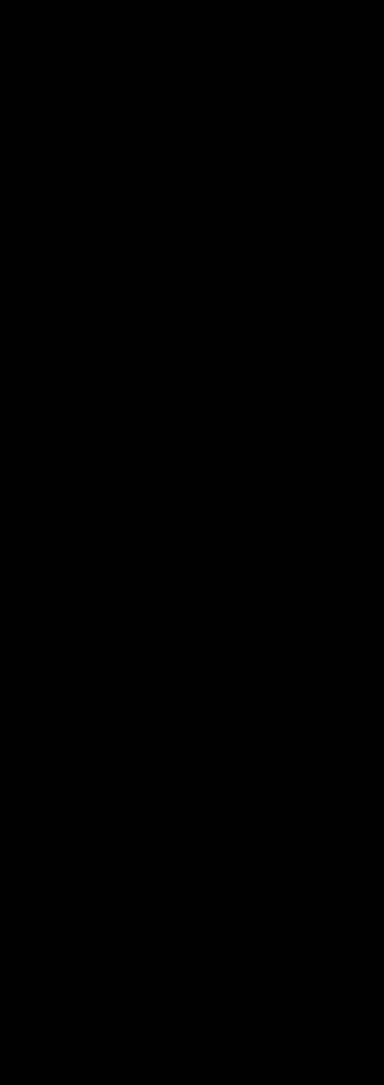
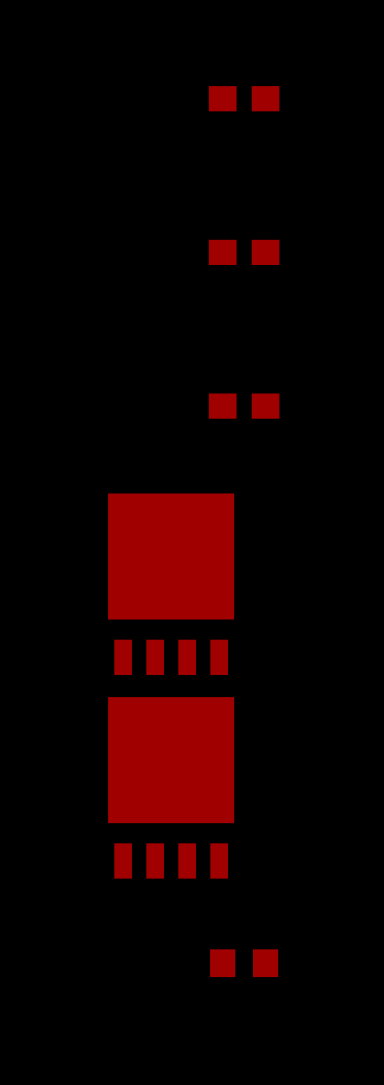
part: none -> (244, 98)
part: none -> (244, 252)
part: none -> (244, 406)
part: none -> (171, 584)
part: none -> (171, 787)
part: none -> (244, 963)

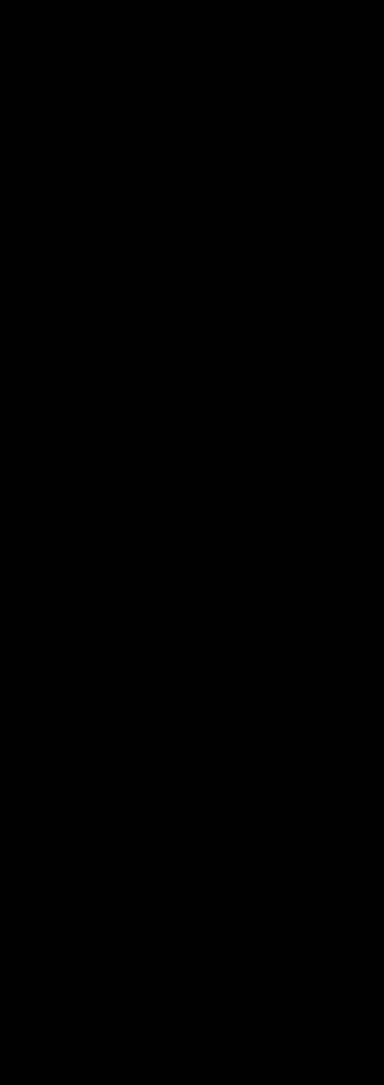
part: (244, 98) -> none
part: (244, 252) -> none
part: (244, 406) -> none
part: (171, 584) -> none
part: (171, 787) -> none
part: (244, 963) -> none

